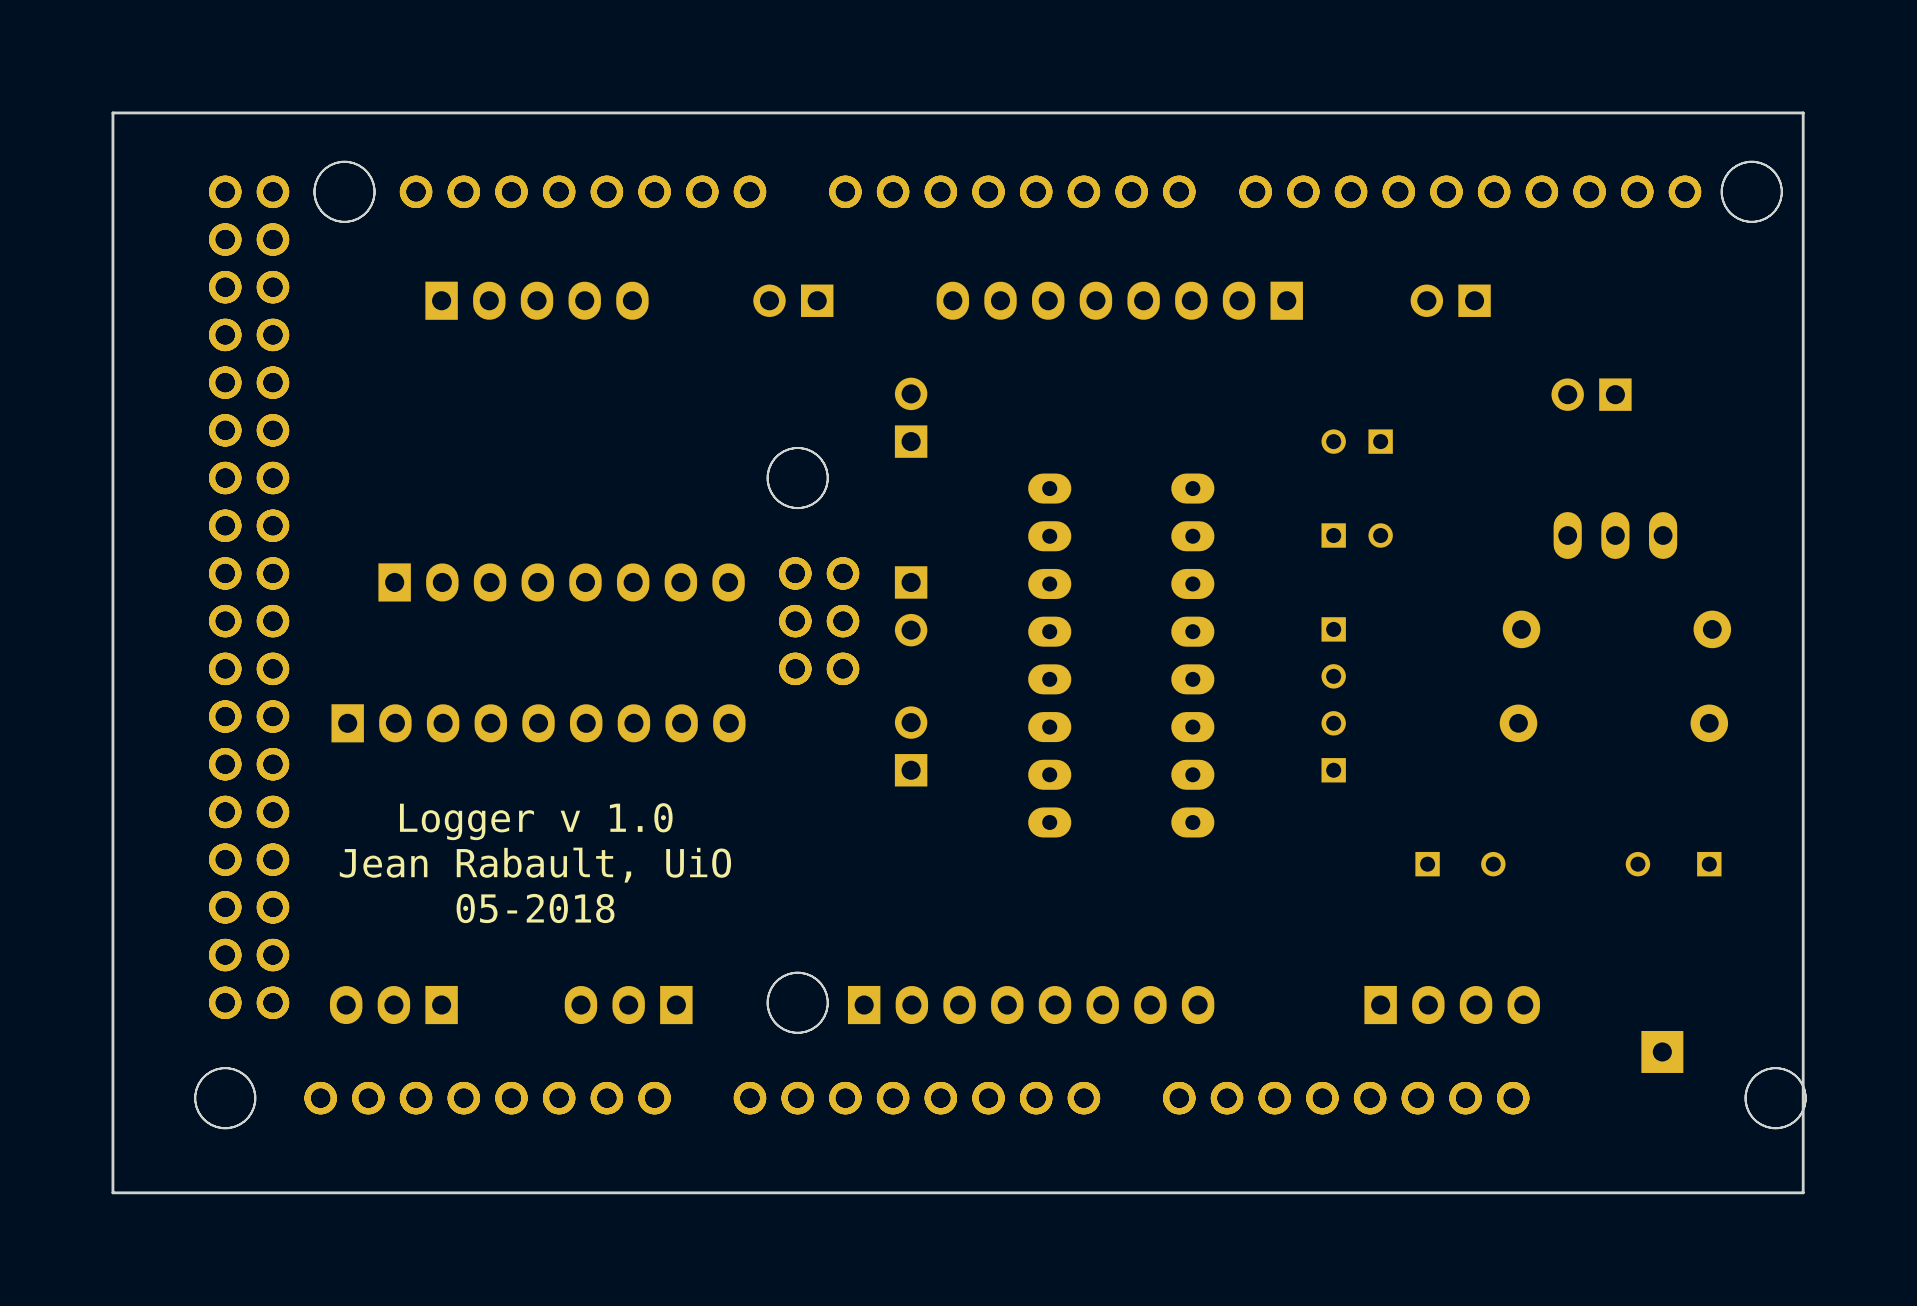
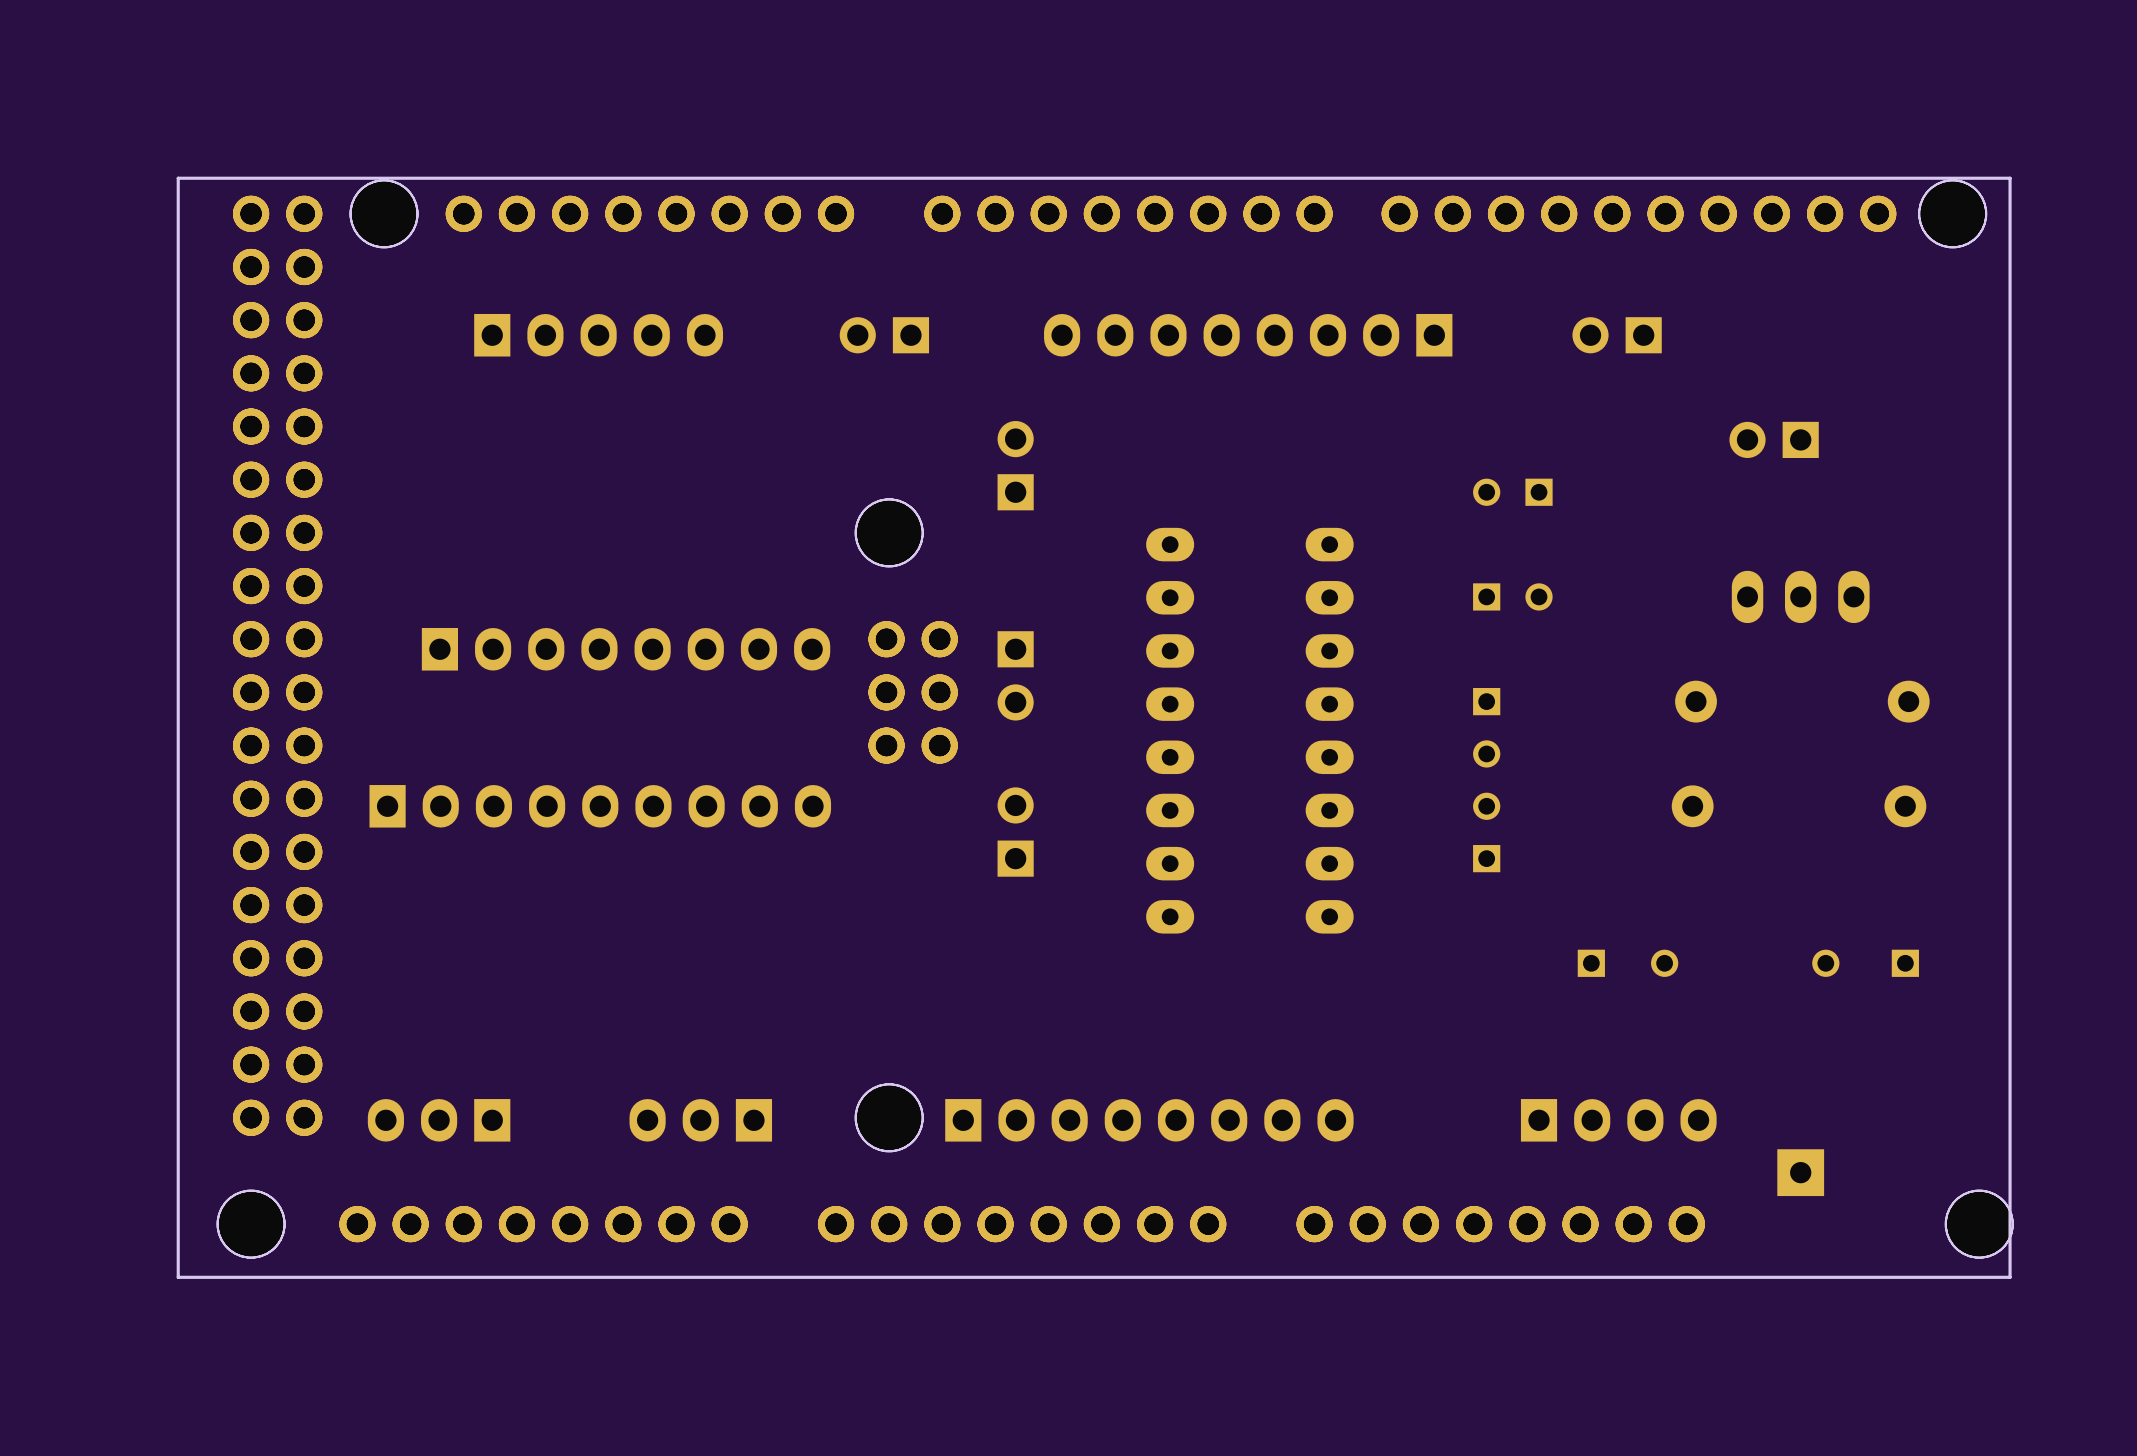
board edge: (1803, 159) (1803, 112) (112, 112) (112, 1192) (1803, 1192) (1803, 1145) -> (2010, 178) (178, 178) (178, 1277) (2010, 1277)
text: Logger v 1.0 (536, 821) -> none
text: Jean Rabault, UiO (535, 865) -> none
text: 05-2018 (535, 908) -> none
part position: (1662, 1051) -> (1800, 1172)

